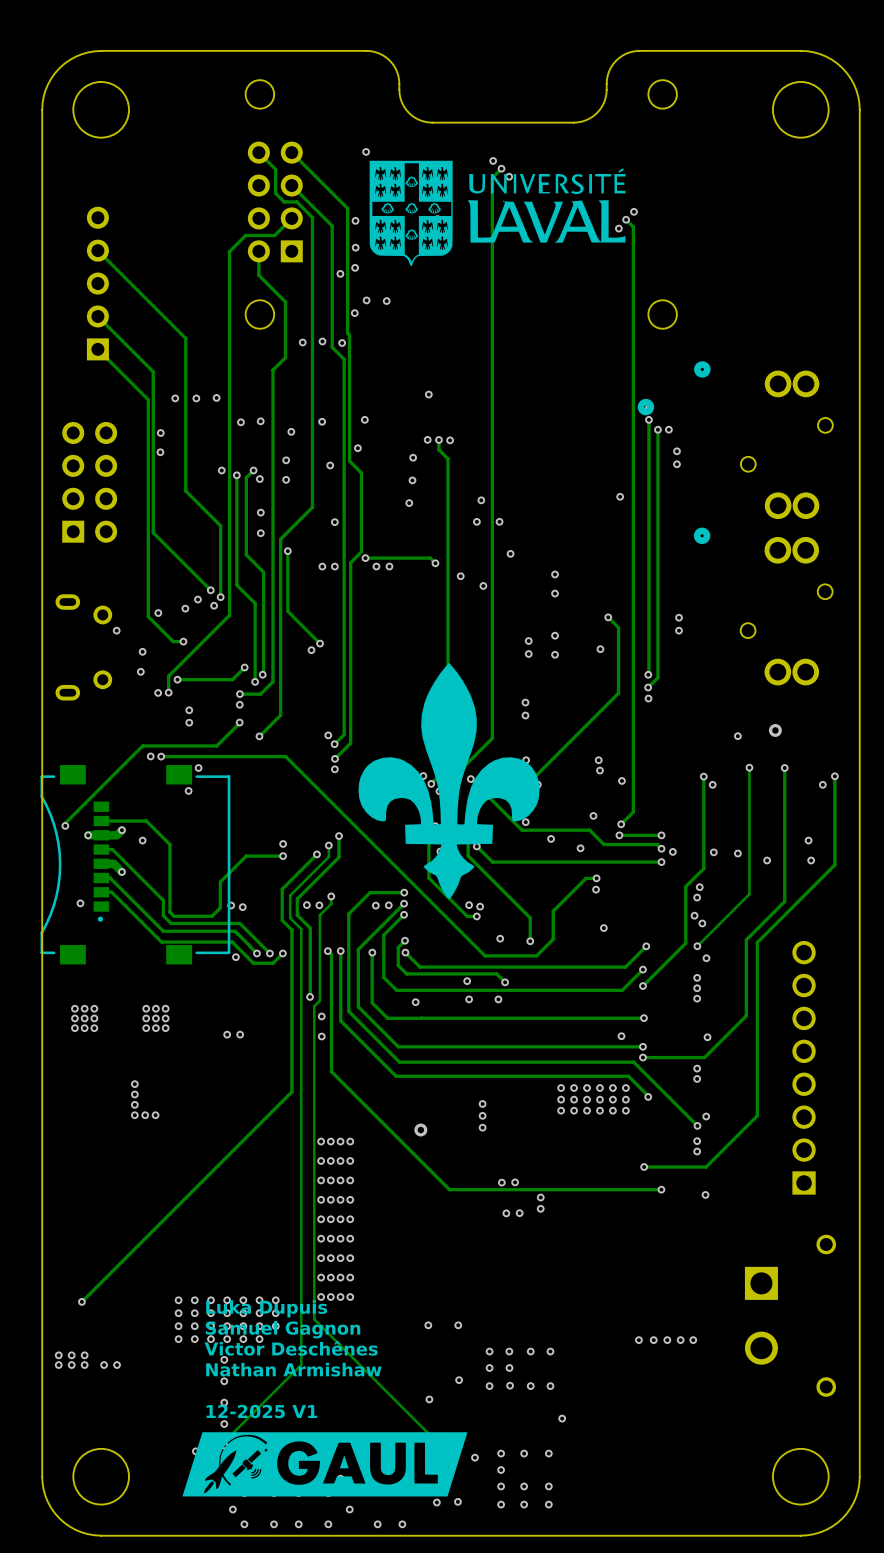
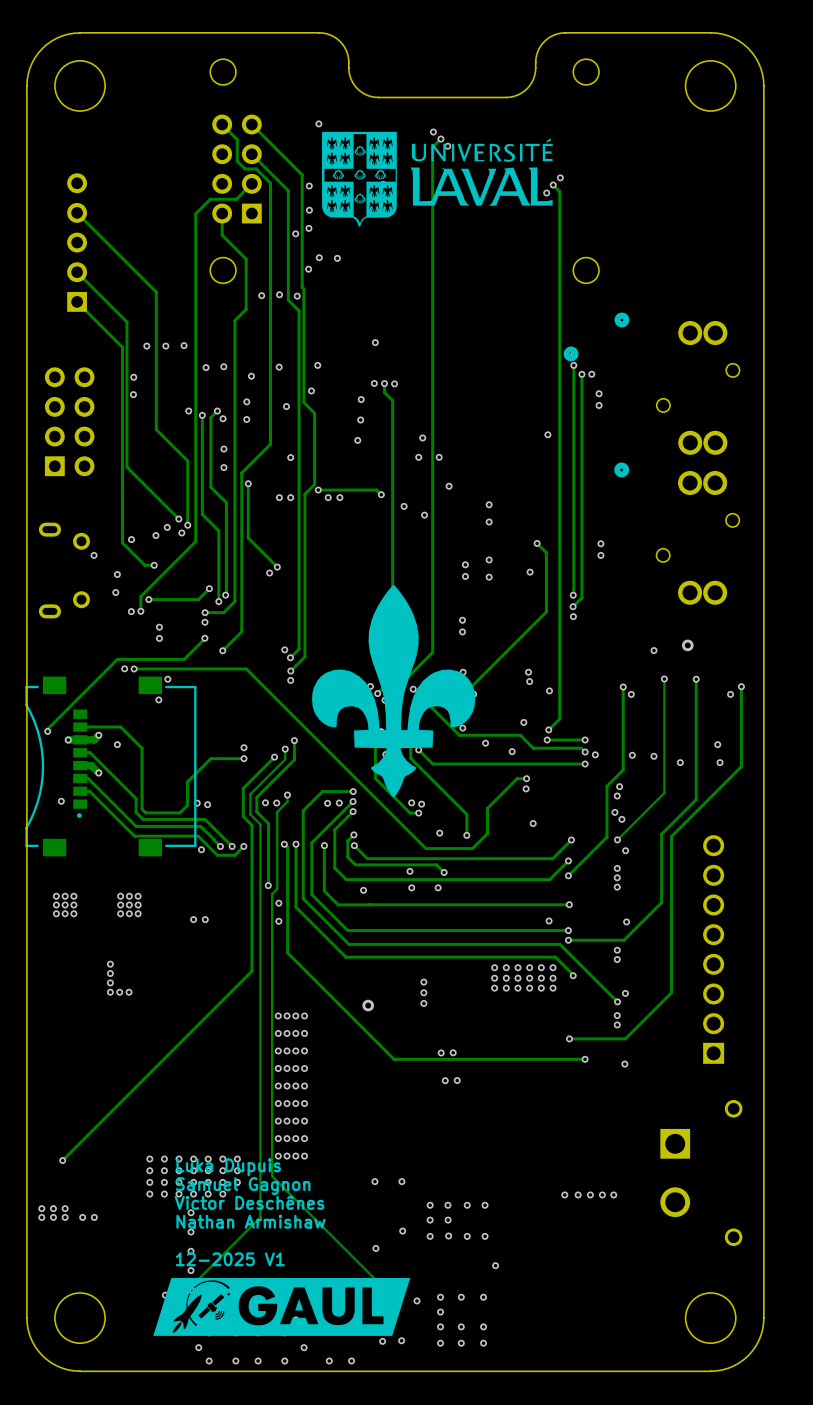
via: (540, 1197) -> none
via: (540, 1208) -> none

